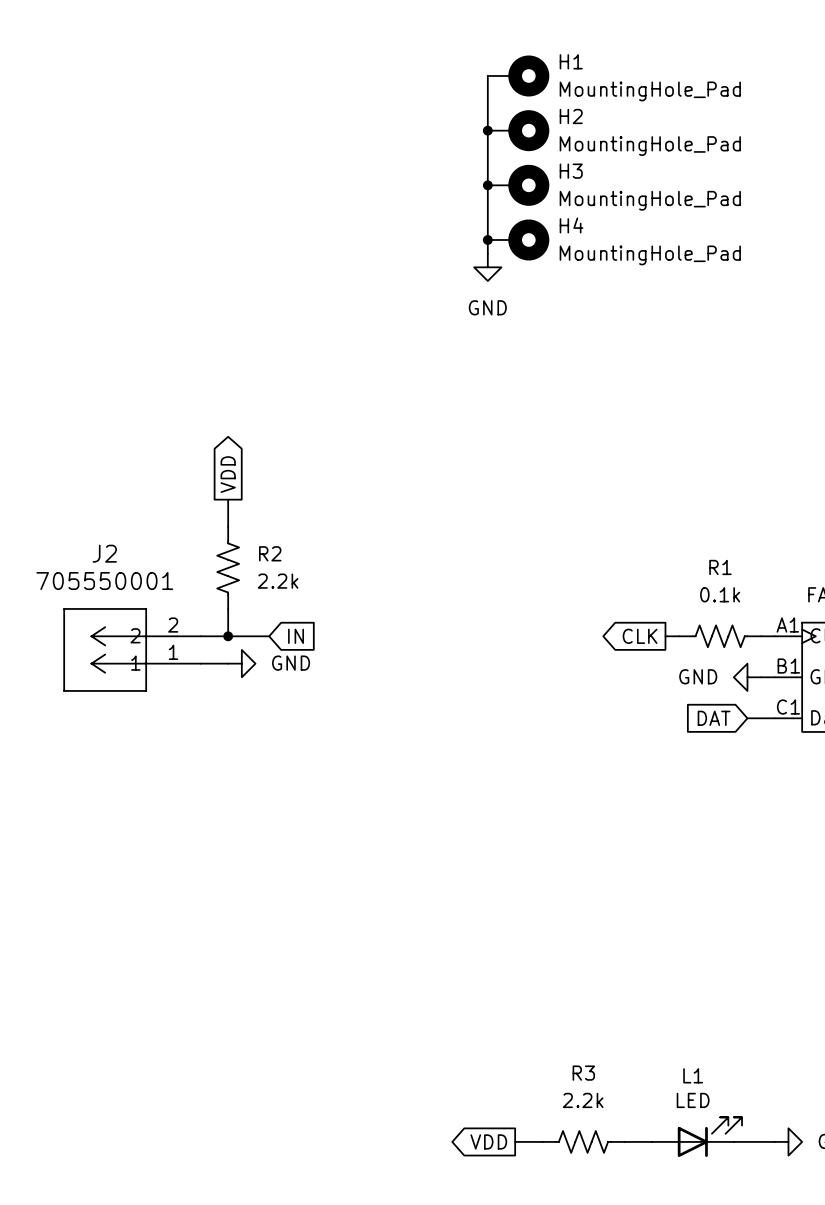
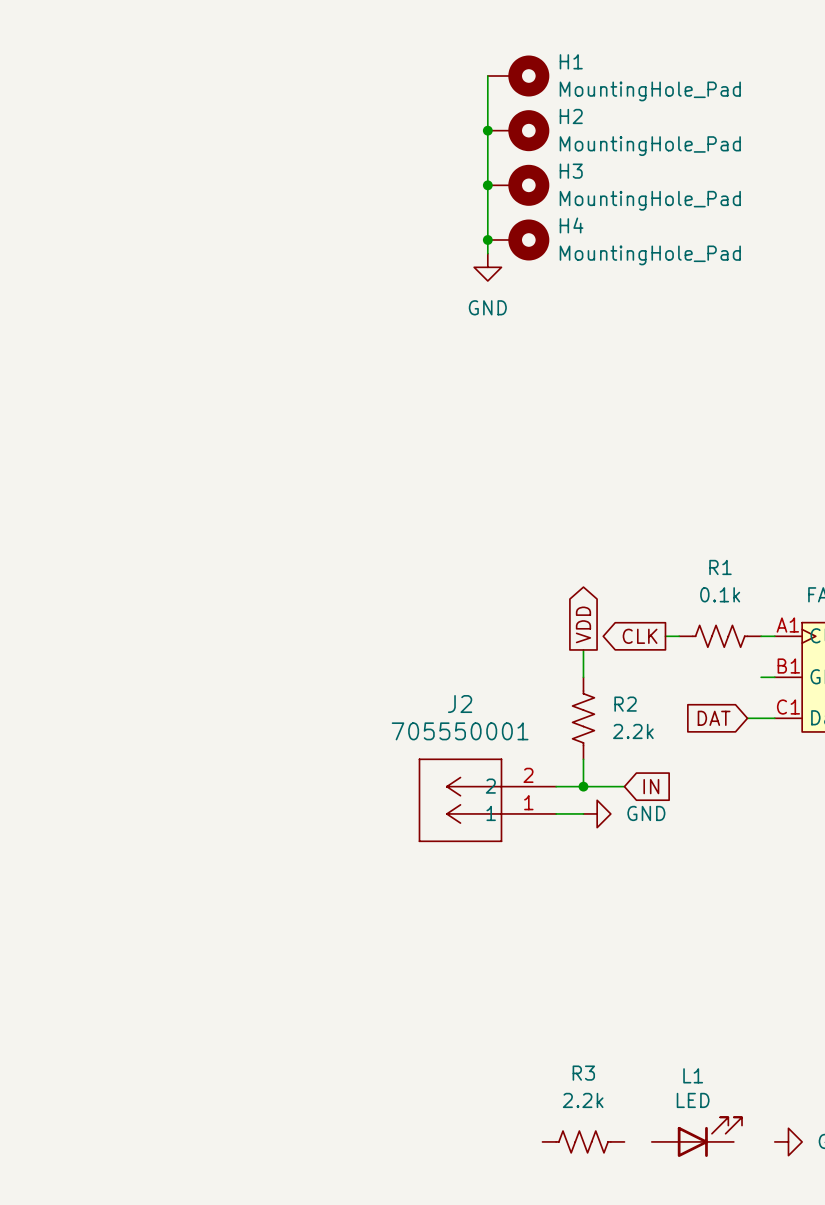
global label: VDD (228, 474) -> none
wire: (228, 499) (228, 526) -> none
R2 position: (228, 567) -> (583, 718)
wire: (228, 608) (228, 636) -> none
global label: none -> VDD (583, 624)
wire: (200, 636) (269, 636) -> none
junction: (228, 636) -> none
global label: IN (296, 636) -> none
J2 position: (132, 649) -> (487, 800)
wire: none -> (583, 649) (583, 677)
wire: (200, 663) (228, 663) -> none
power symbol: GND (241, 663) -> none
power symbol: GND (747, 677) -> none
wire: none -> (583, 759) (583, 786)
wire: none -> (556, 786) (624, 786)
junction: none -> (583, 786)
global label: none -> IN (651, 786)
wire: none -> (556, 813) (583, 813)
power symbol: none -> GND (597, 813)
global label: VDD (488, 1141) -> none
wire: (515, 1141) (542, 1141) -> none
wire: (624, 1141) (651, 1141) -> none
wire: (733, 1141) (774, 1141) -> none

